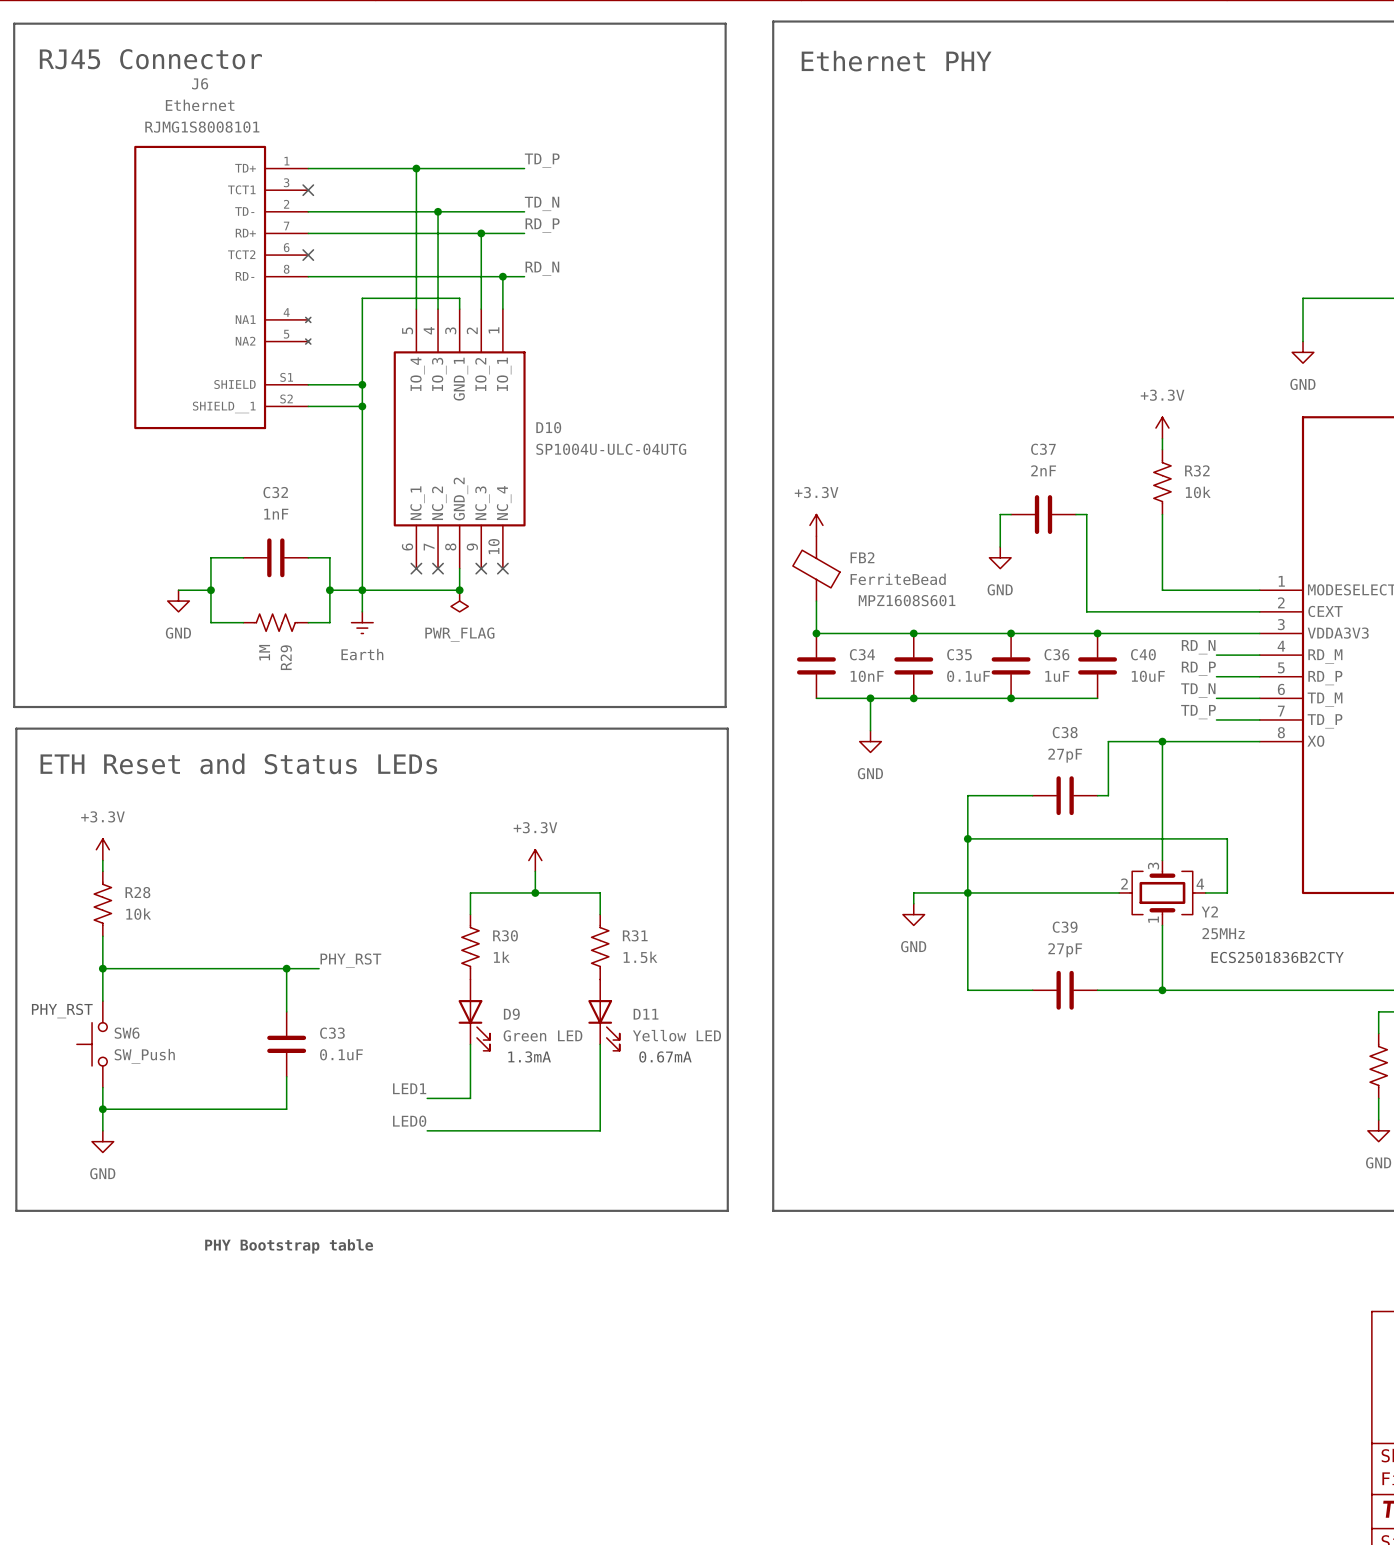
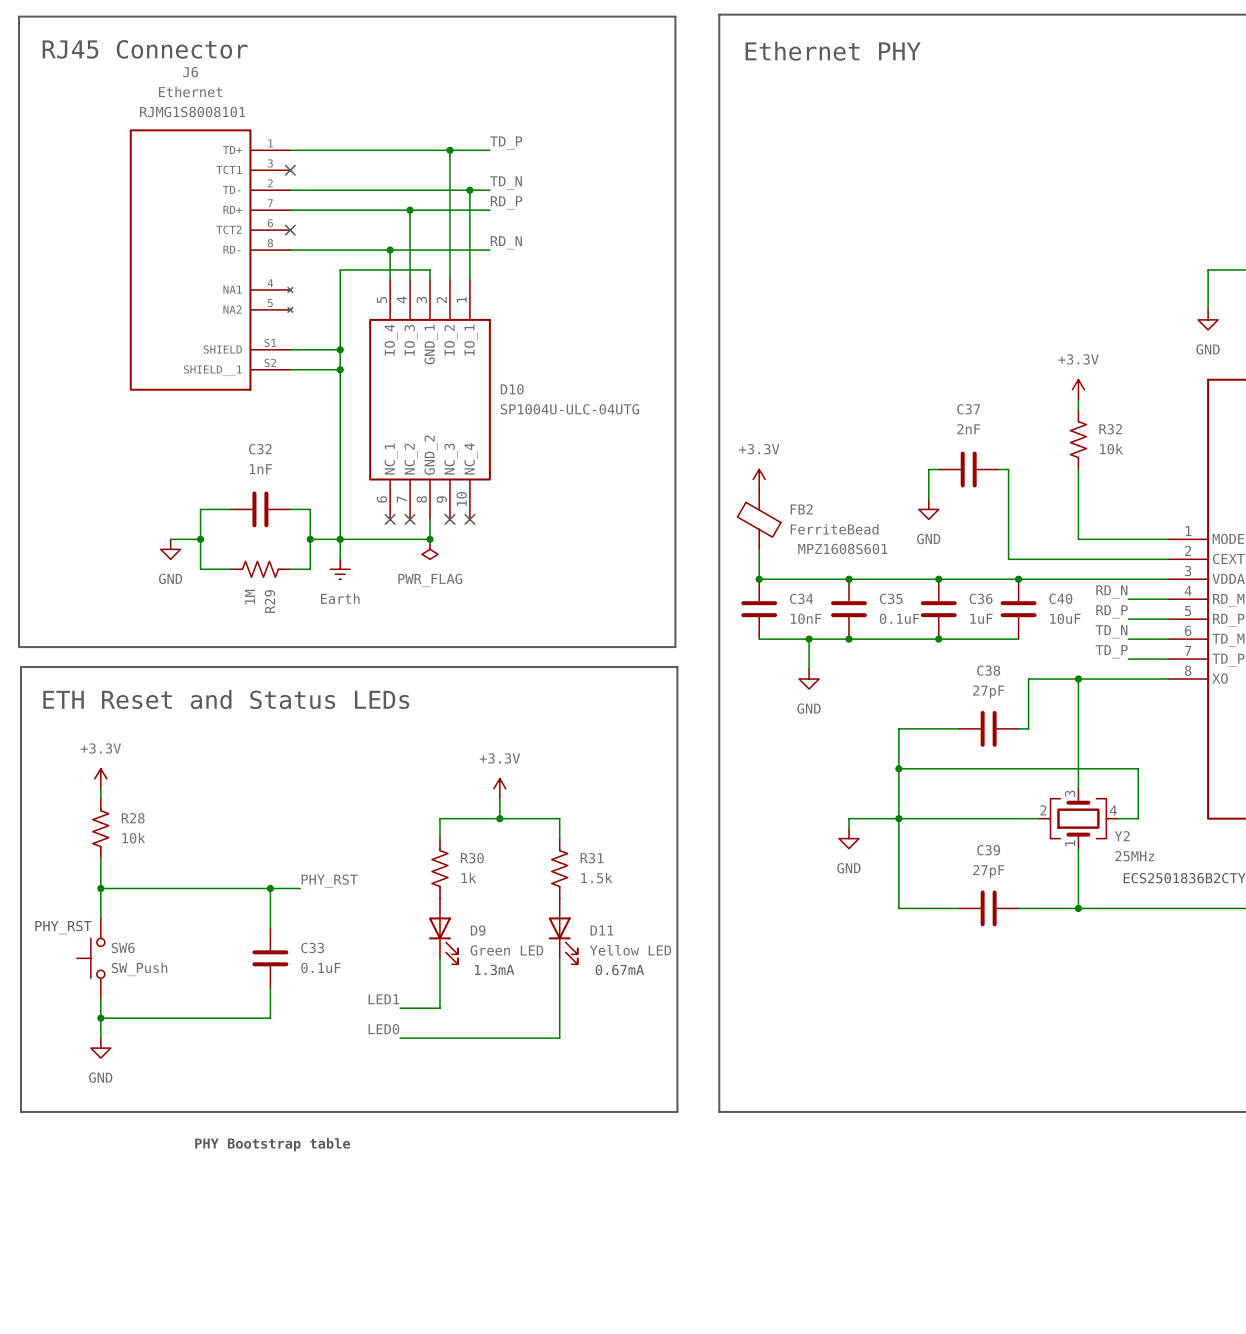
wire: (416, 168) (416, 276) -> none
junction: (416, 168) -> none
wire: none -> (449, 150) (449, 210)
junction: none -> (449, 150)
wire: (438, 211) (438, 233) -> none
junction: (438, 211) -> none
wire: none -> (469, 190) (469, 250)
junction: none -> (469, 190)
junction: none -> (410, 210)
junction: (481, 233) -> none
junction: none -> (390, 250)
junction: (502, 276) -> none

